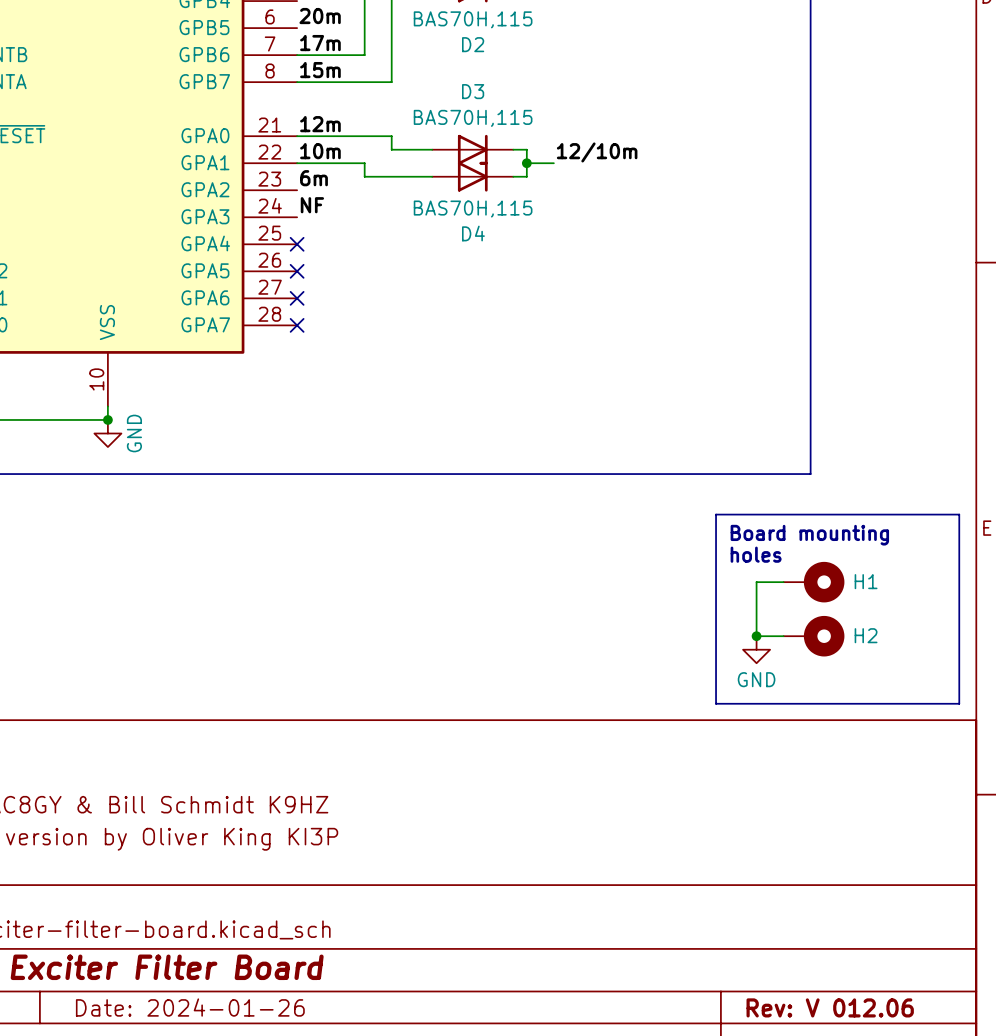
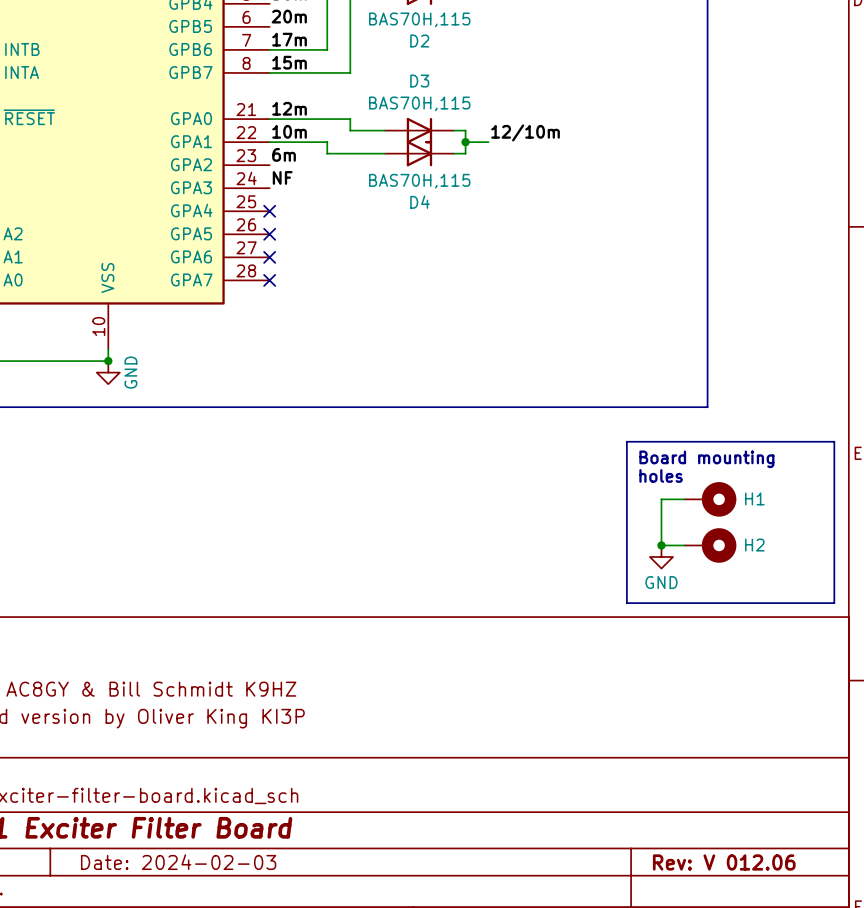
title block: Date: 2024-01-26 (190, 1007) -> Date: 2024-02-03 (178, 862)

